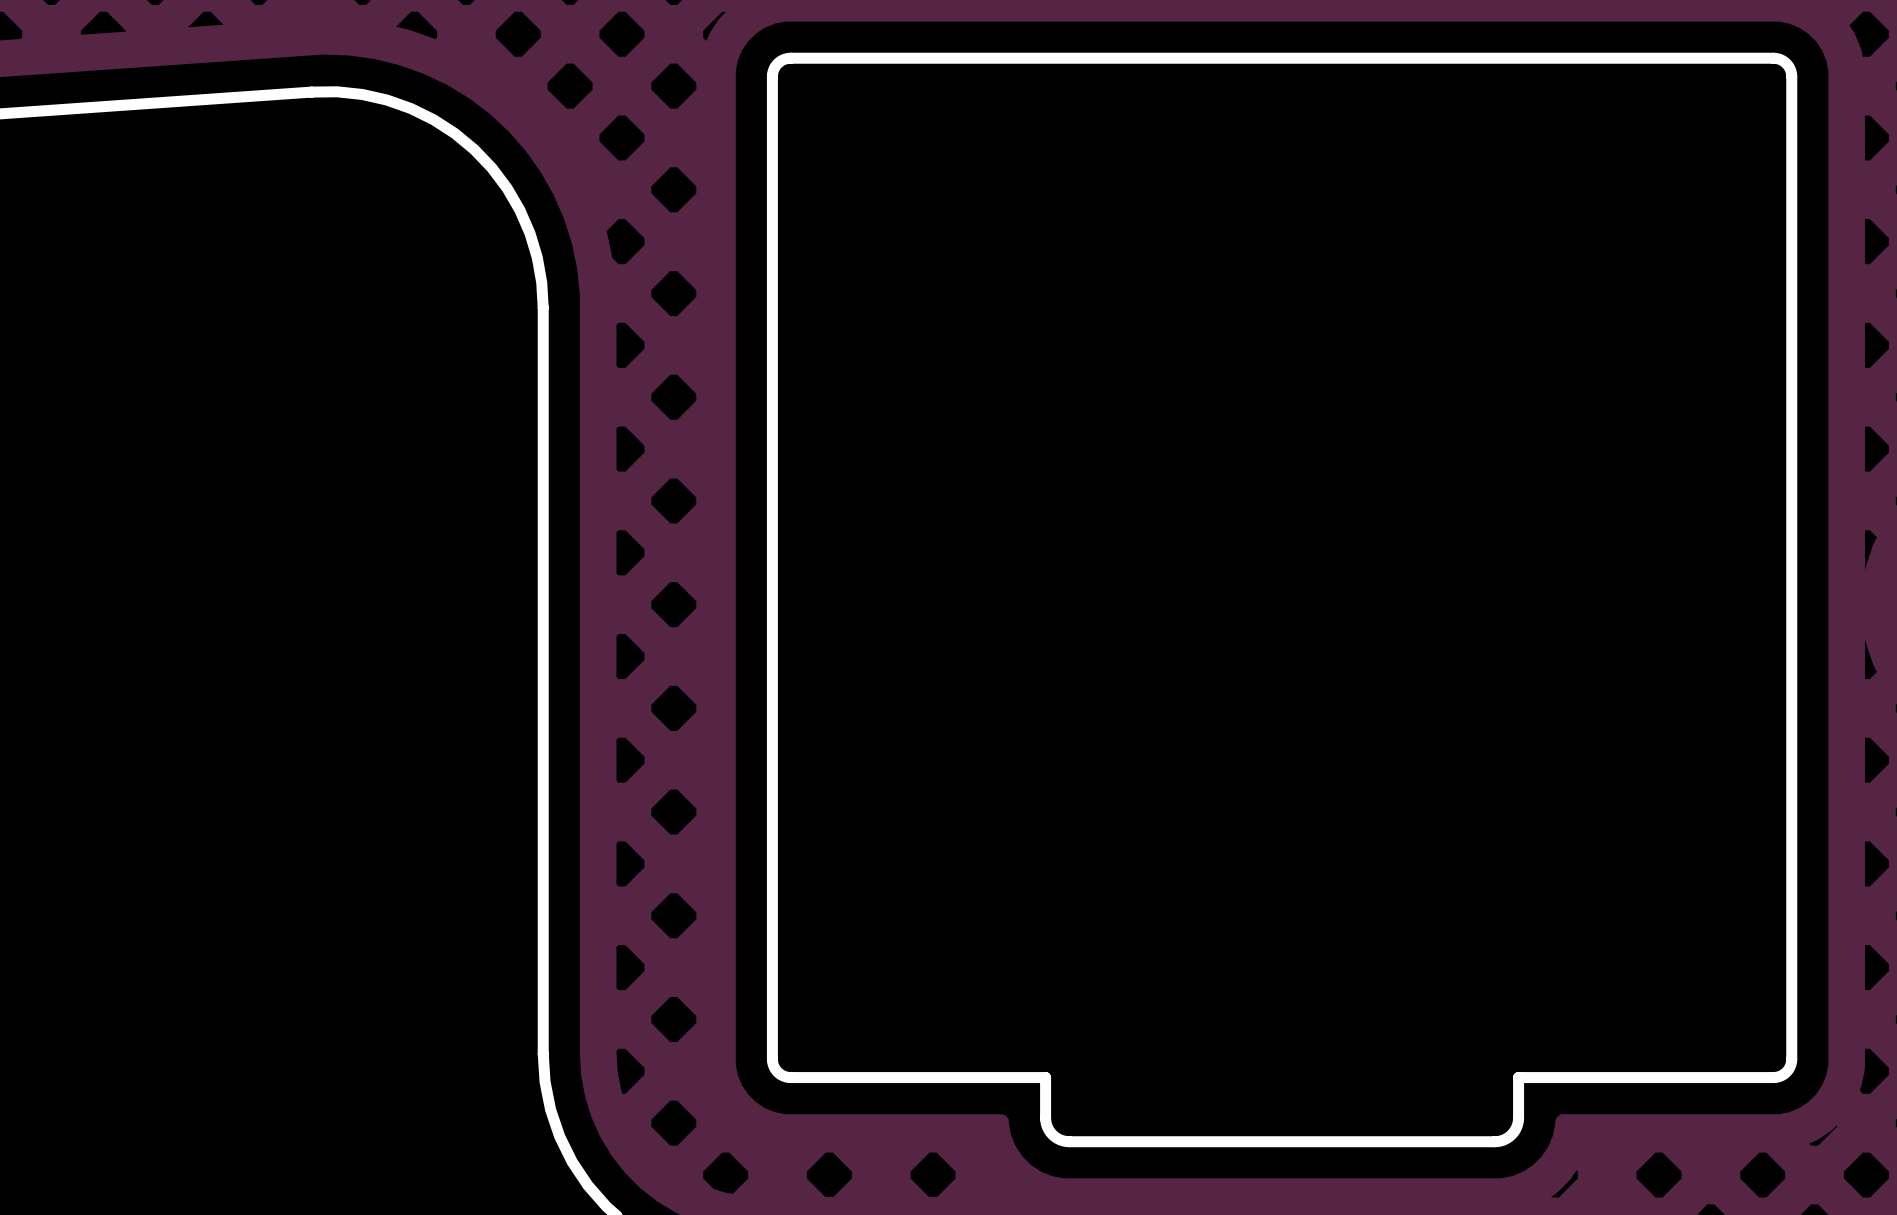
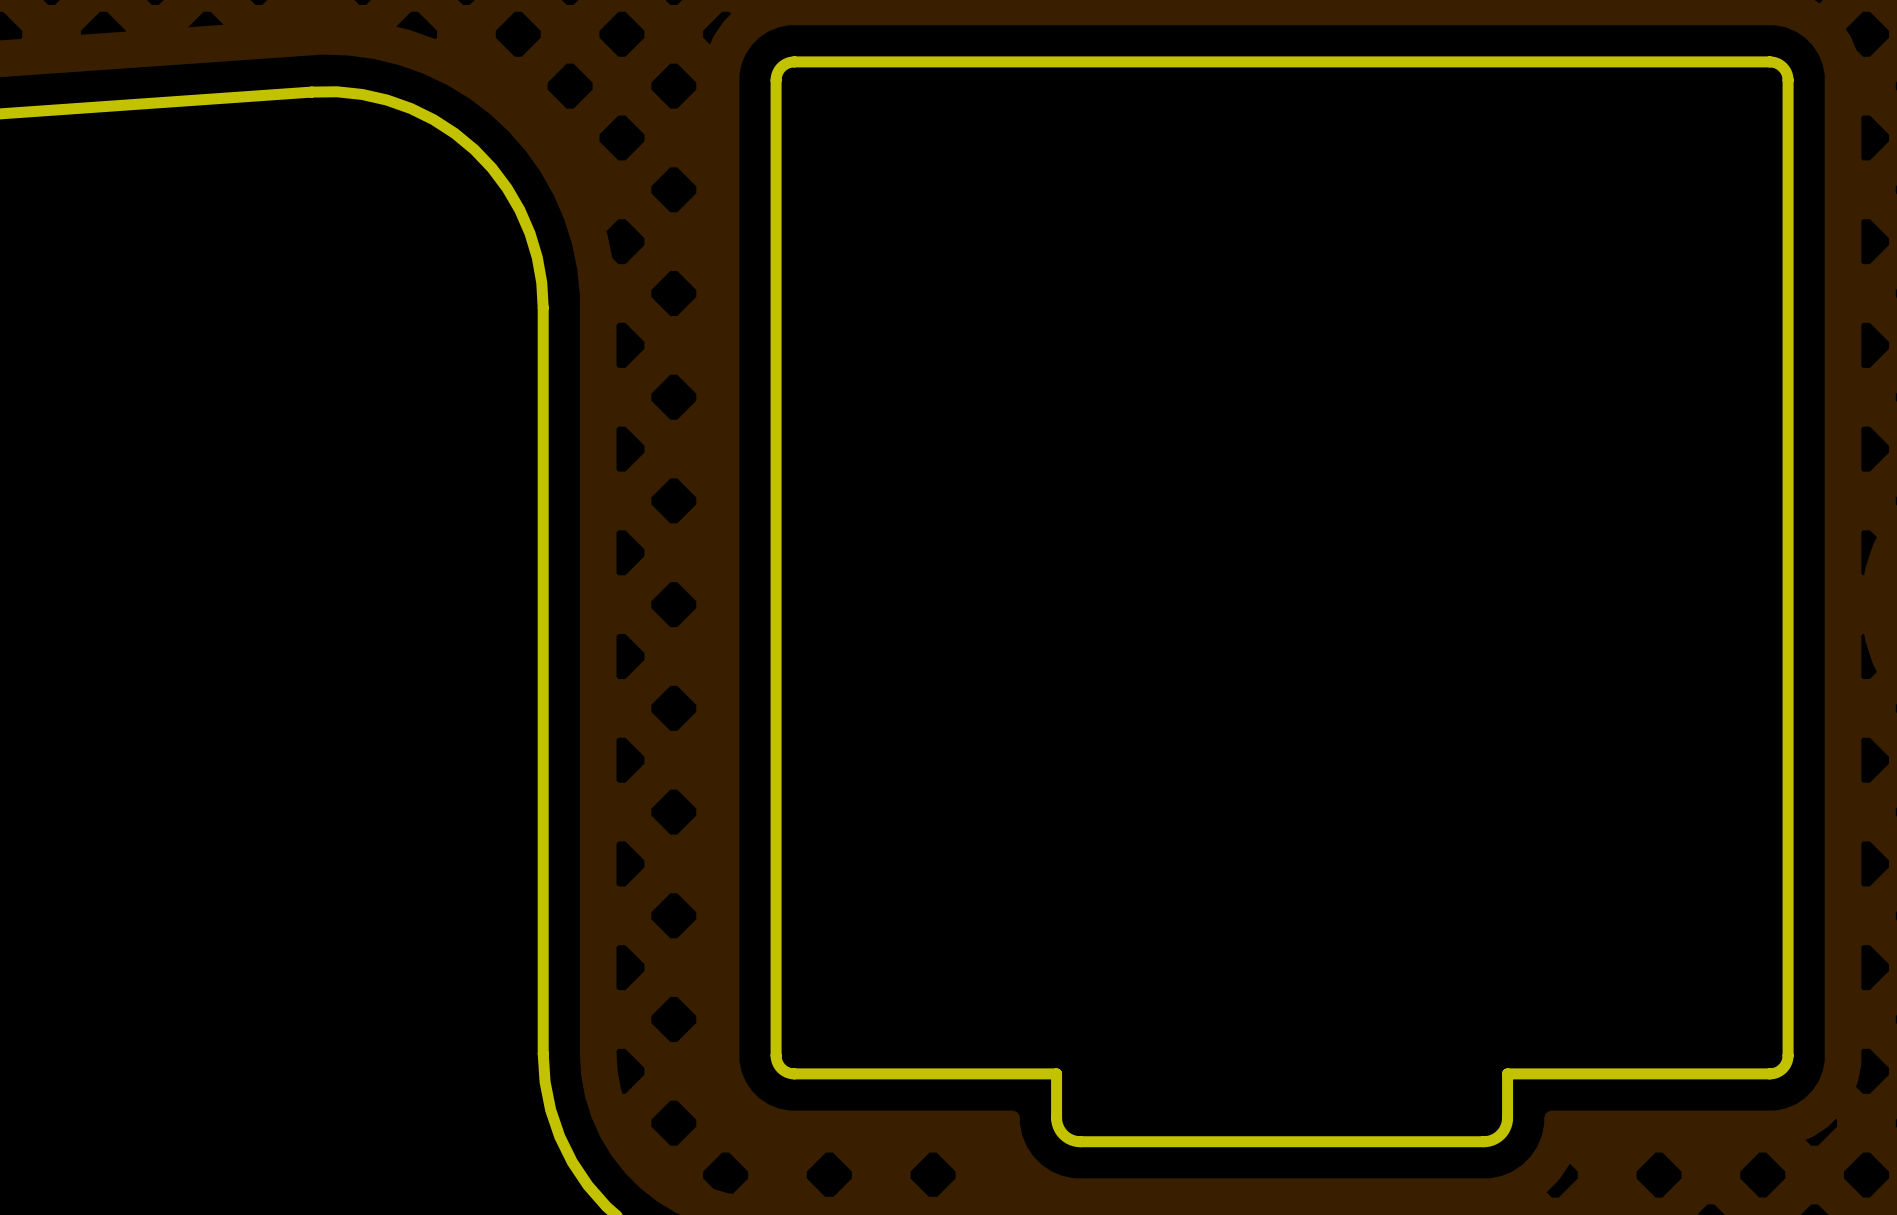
board edge: (1080, 1141) (1060, 1139) (1048, 1129) (1045, 1117) (1045, 1077) (790, 1077) (779, 1073) (773, 1063) (772, 76) (776, 65) (786, 58) (1773, 58) (1781, 60) (1788, 66) (1791, 76) (1791, 1063) (1784, 1073) (1773, 1077) (1518, 1077) (1518, 1117) (1516, 1128) (1505, 1139) (1483, 1141) -> (1080, 1141) (1068, 1138) (1058, 1127) (1056, 1117) (1056, 1073) (794, 1073) (783, 1070) (776, 1060) (776, 80) (779, 69) (789, 62) (1769, 61) (1777, 63) (1785, 70) (1788, 80) (1787, 1059) (1781, 1069) (1769, 1073) (1507, 1073) (1506, 1125) (1498, 1136) (1483, 1141)

